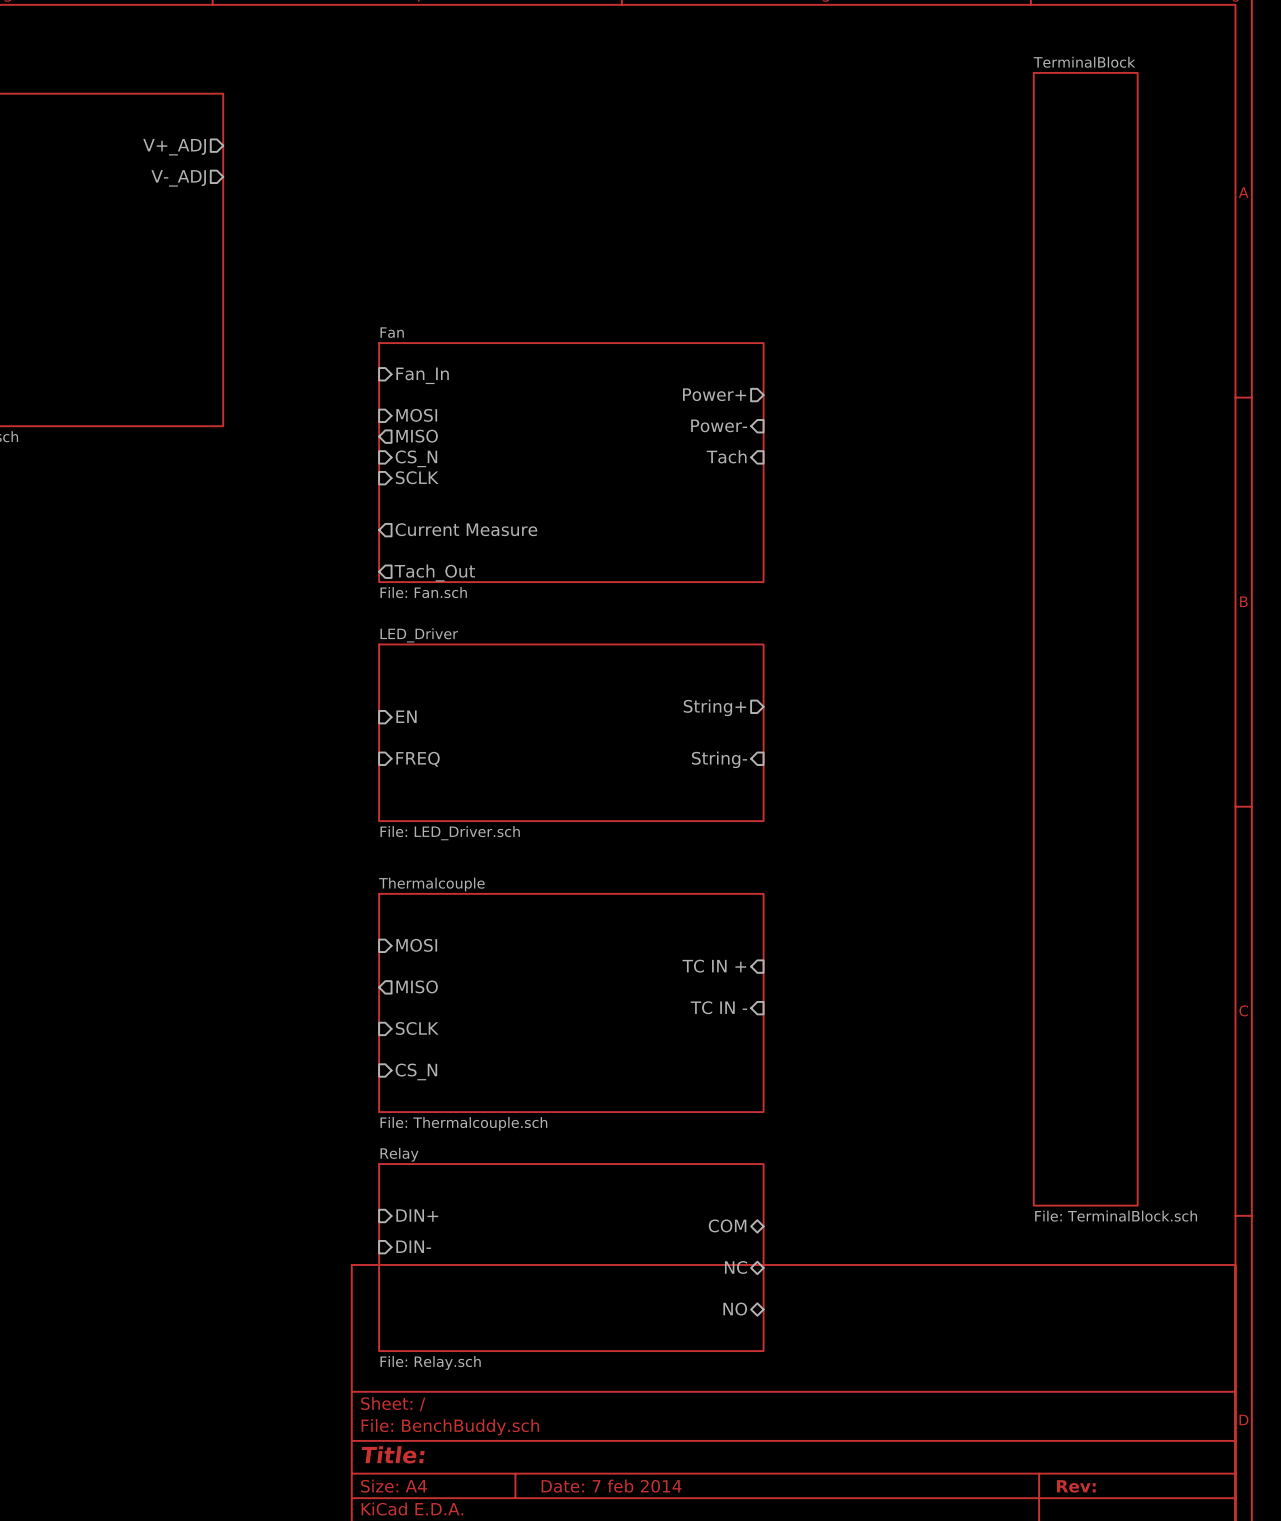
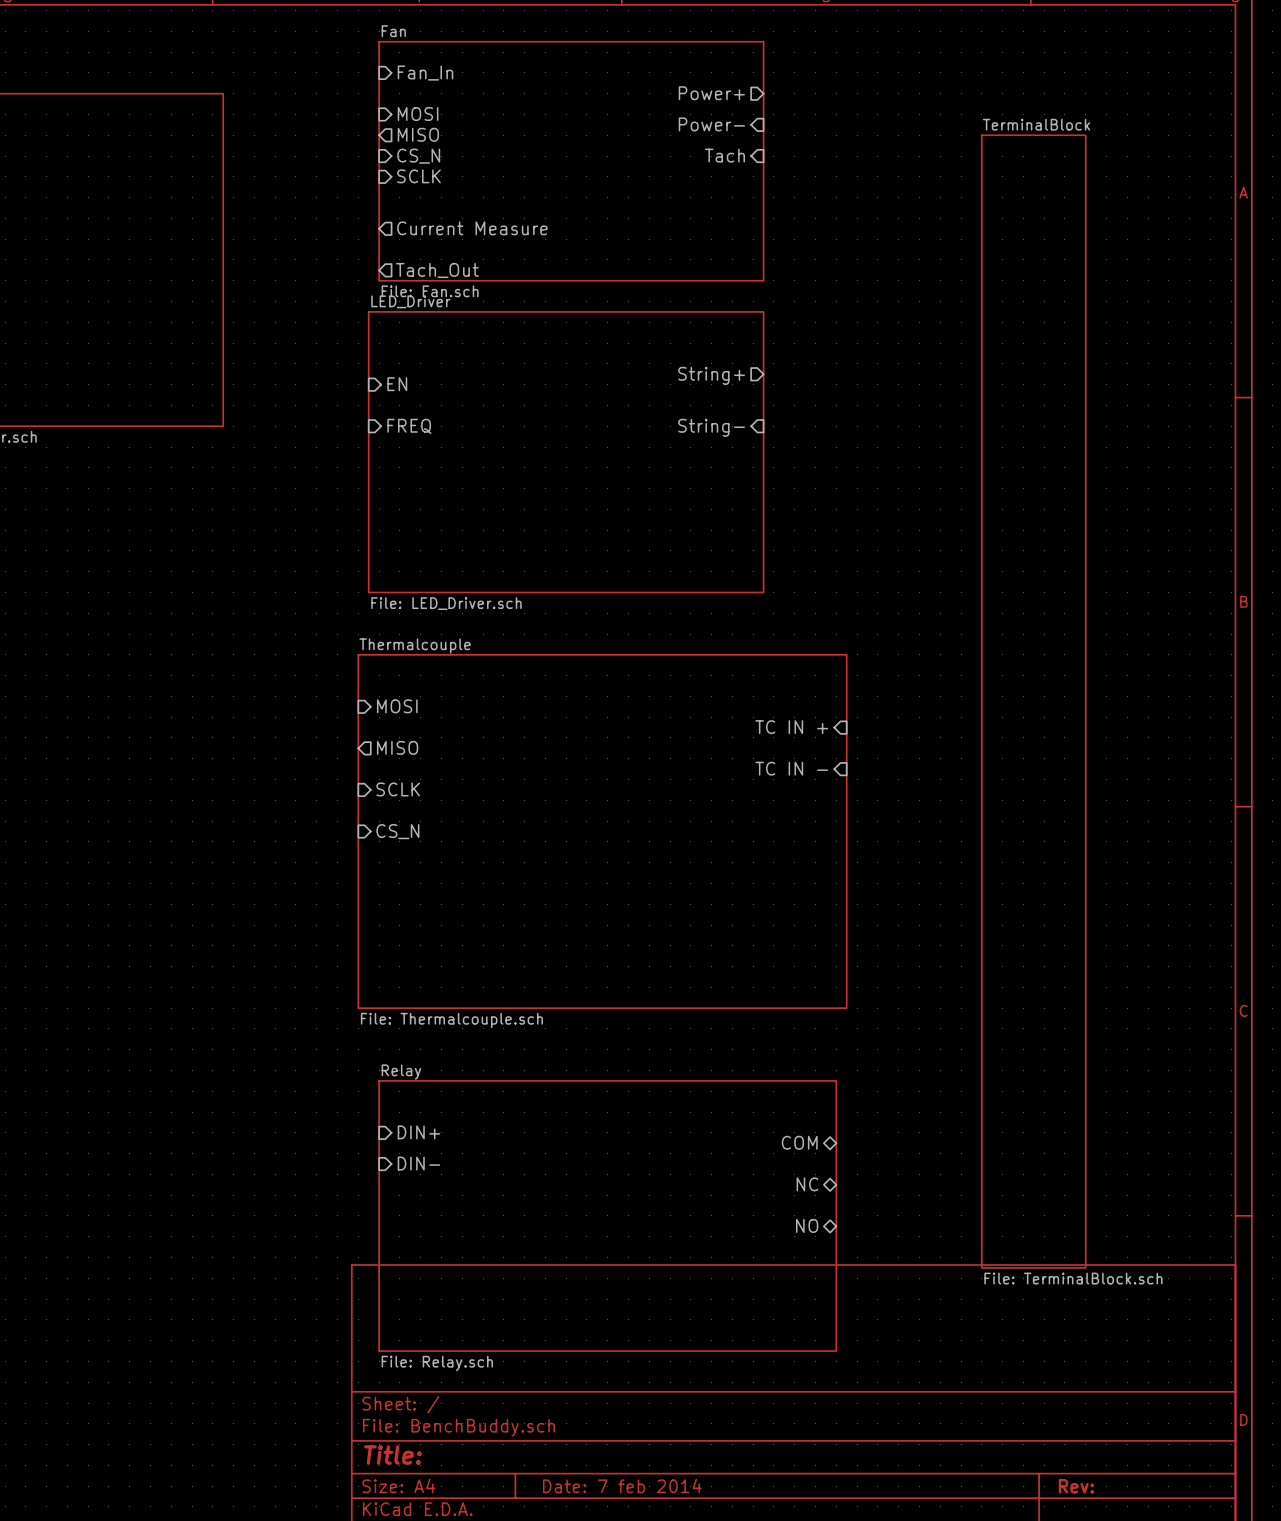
sheet pin: none -> Fan_In (425, 73)
sheet pin: none -> Power+ (711, 93)
sheet pin: none -> MOSI (418, 114)
sheet pin: none -> Power- (711, 124)
sheet pin: none -> MISO (418, 134)
sheet pin: V+_ADJ (174, 147) -> none
sheet pin: none -> Tach (724, 155)
sheet pin: none -> CS_N (418, 156)
sheet Fan: none -> File: Fan.sch (571, 161)
sheet pin: none -> SCLK (418, 176)
sheet pin: V-_ADJ (178, 178) -> none
sheet pin: none -> Current Measure (472, 228)
sheet pin: none -> Tach_Out (437, 270)
sheet pin: Fan_In (422, 375) -> none
sheet pin: none -> String+ (711, 375)
sheet pin: none -> EN (397, 384)
sheet pin: Power+ (714, 394) -> none
sheet pin: MOSI (416, 415) -> none
sheet pin: Power- (719, 425) -> String- (711, 427)
sheet pin: none -> FREQ (409, 426)
sheet pin: MISO (417, 436) -> none
sheet LED_Driver: none -> File: LED_Driver.sch (566, 452)
sheet pin: Tach (726, 456) -> none
sheet pin: CS_N (416, 458) -> none
sheet Fan: File: Fan.sch (571, 462) -> none
sheet pin: SCLK (417, 477) -> none
sheet pin: Current Measure (466, 529) -> none
sheet pin: Tach_Out (434, 573) -> none
sheet TerminalBlock position: (1085, 639) -> (1033, 701)
sheet pin: none -> MOSI (397, 706)
sheet pin: String+ (714, 707) -> none
sheet pin: EN (406, 716) -> none
sheet pin: none -> TC IN + (791, 727)
sheet LED_Driver: File: LED_Driver.sch (571, 732) -> none
sheet pin: none -> MISO (397, 747)
sheet pin: FREQ (418, 759) -> none
sheet pin: String- (719, 759) -> none
sheet pin: none -> TC IN - (791, 768)
sheet pin: none -> SCLK (398, 789)
sheet Thermalcouple: none -> File: Thermalcouple.sch (602, 831)
sheet pin: none -> CS_N (397, 831)
sheet pin: MOSI (416, 945) -> none
sheet pin: TC IN + (714, 966) -> none
sheet pin: MISO (417, 986) -> none
sheet Thermalcouple: File: Thermalcouple.sch (571, 1002) -> none
sheet pin: TC IN - (718, 1007) -> none
sheet pin: SCLK (417, 1028) -> none
sheet pin: CS_N (416, 1071) -> none
sheet pin position: DIN+ (417, 1215) -> DIN+ (418, 1132)
sheet Relay: none -> File: Relay.sch (607, 1215)
sheet pin position: COM (727, 1225) -> COM (799, 1142)
sheet pin position: DIN- (413, 1246) -> DIN- (418, 1163)
sheet Relay: File: Relay.sch (571, 1257) -> none
sheet pin position: NC (736, 1267) -> NC (807, 1184)
sheet pin position: NO (735, 1309) -> NO (807, 1225)

